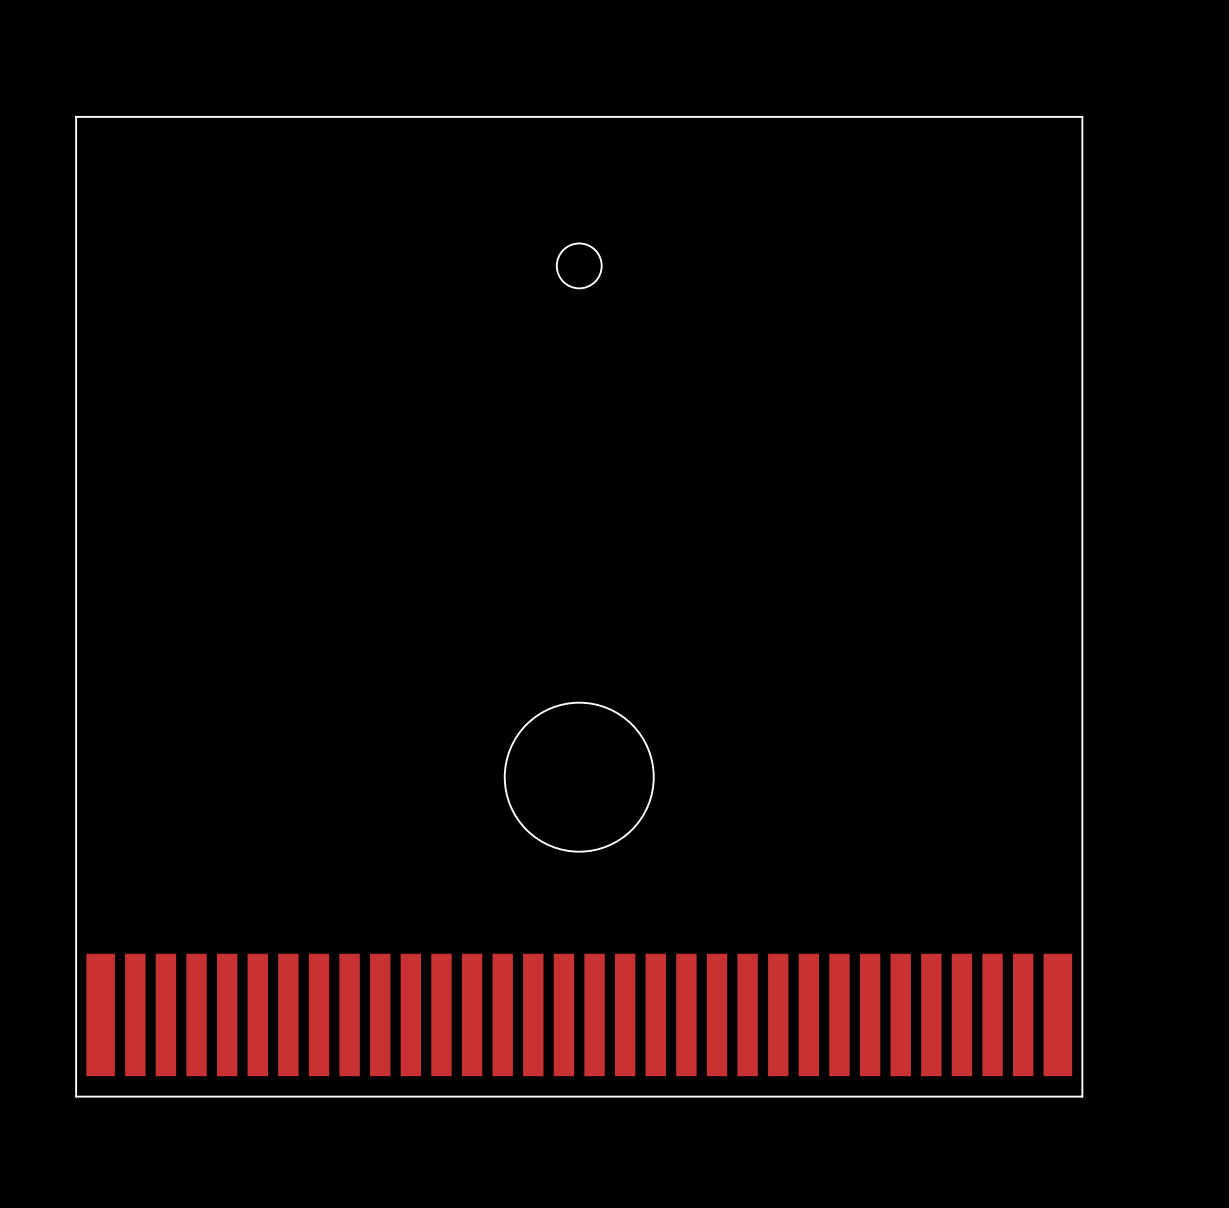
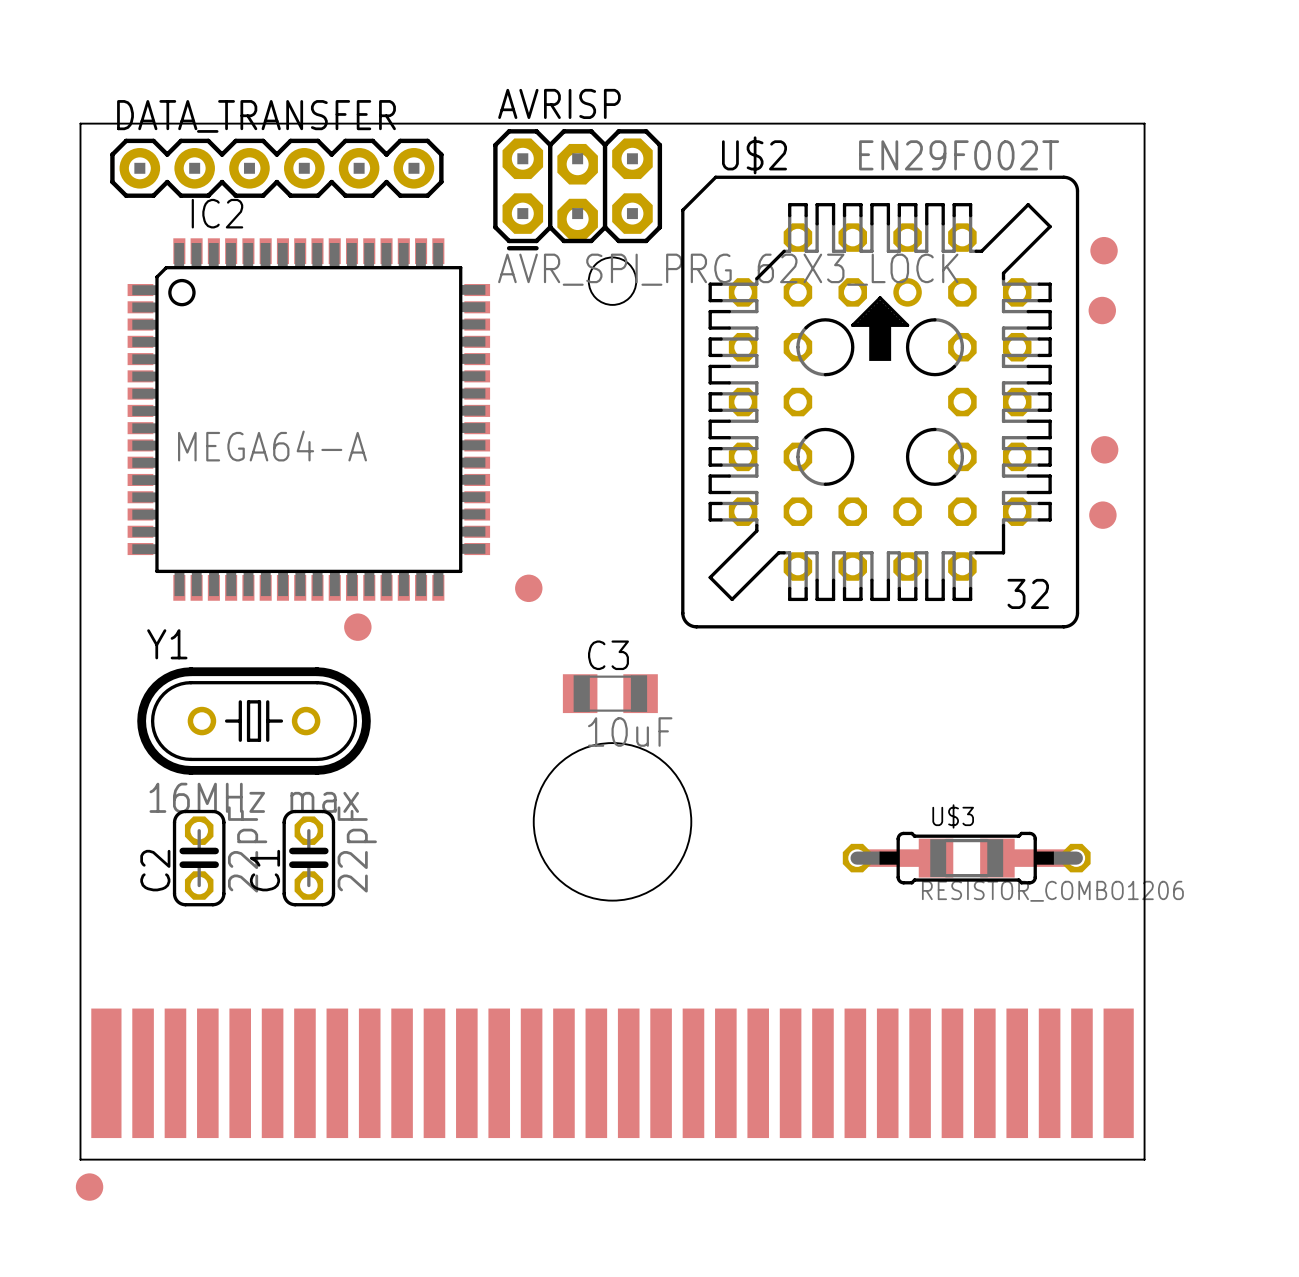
DATA_TRANSFER: none -> (276, 168)
AVRISP: none -> AVR_SPI_PRG_62X3_LOCK (577, 189)
part: none -> (1104, 250)
part: none -> (1102, 310)
U$2: none -> EN29F002T (880, 402)
IC2: none -> MEGA64-A (308, 419)
part: none -> (1104, 449)
part: none -> (1102, 515)
part: none -> (528, 588)
part: none -> (357, 627)
C3: none -> 10uF (610, 693)
Y1: none -> 16MHz max (254, 721)
C2: none -> 22pF (199, 858)
C1: none -> 22pF (308, 858)
U$3: none -> RESISTOR_COMBO1206 (966, 858)
part: none -> (89, 1187)

